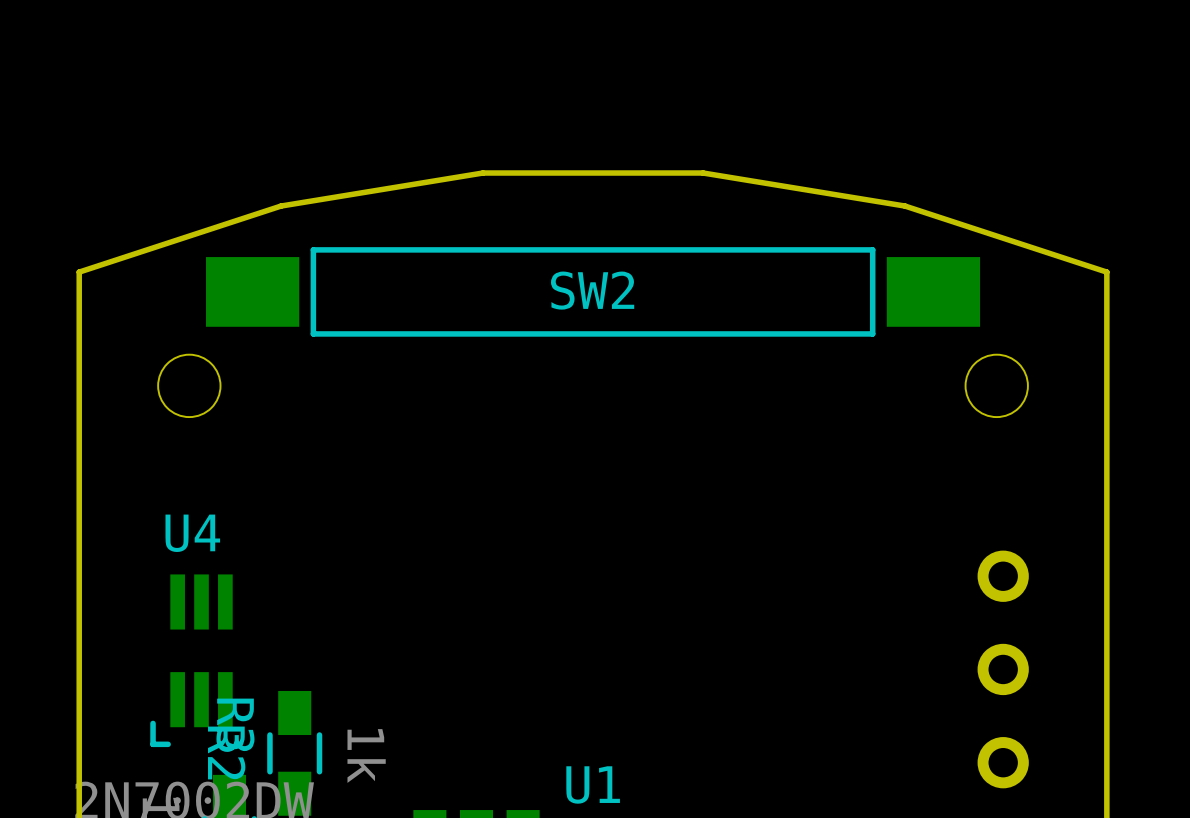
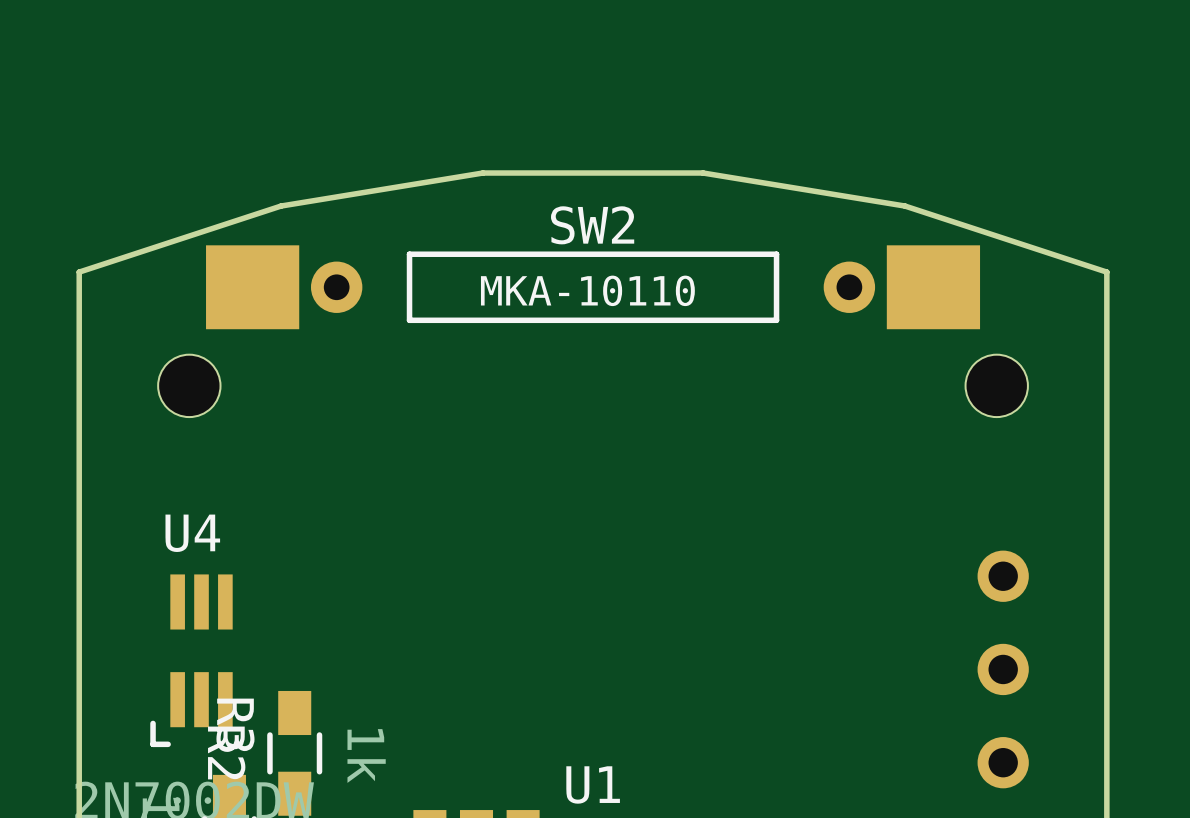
SW2 footprint: [206, 247, 981, 337] -> [206, 245, 981, 330]
SW2 value: none -> MKA-10110 (587, 290)

